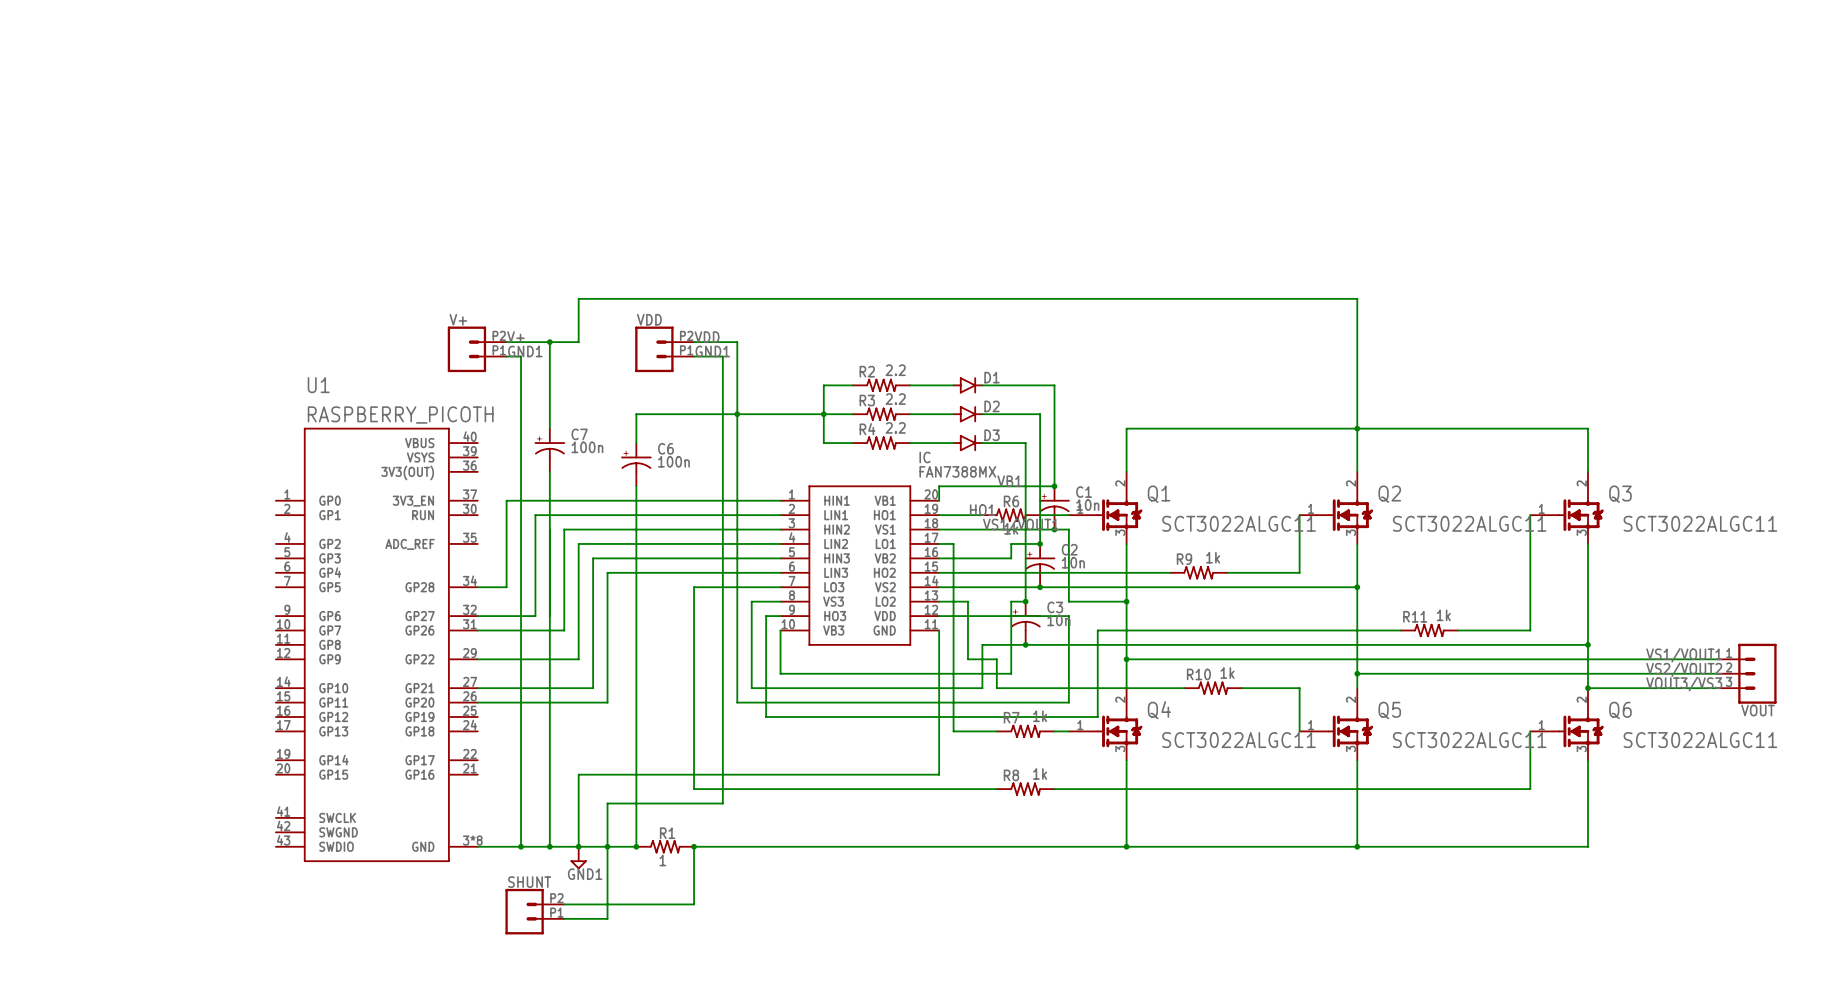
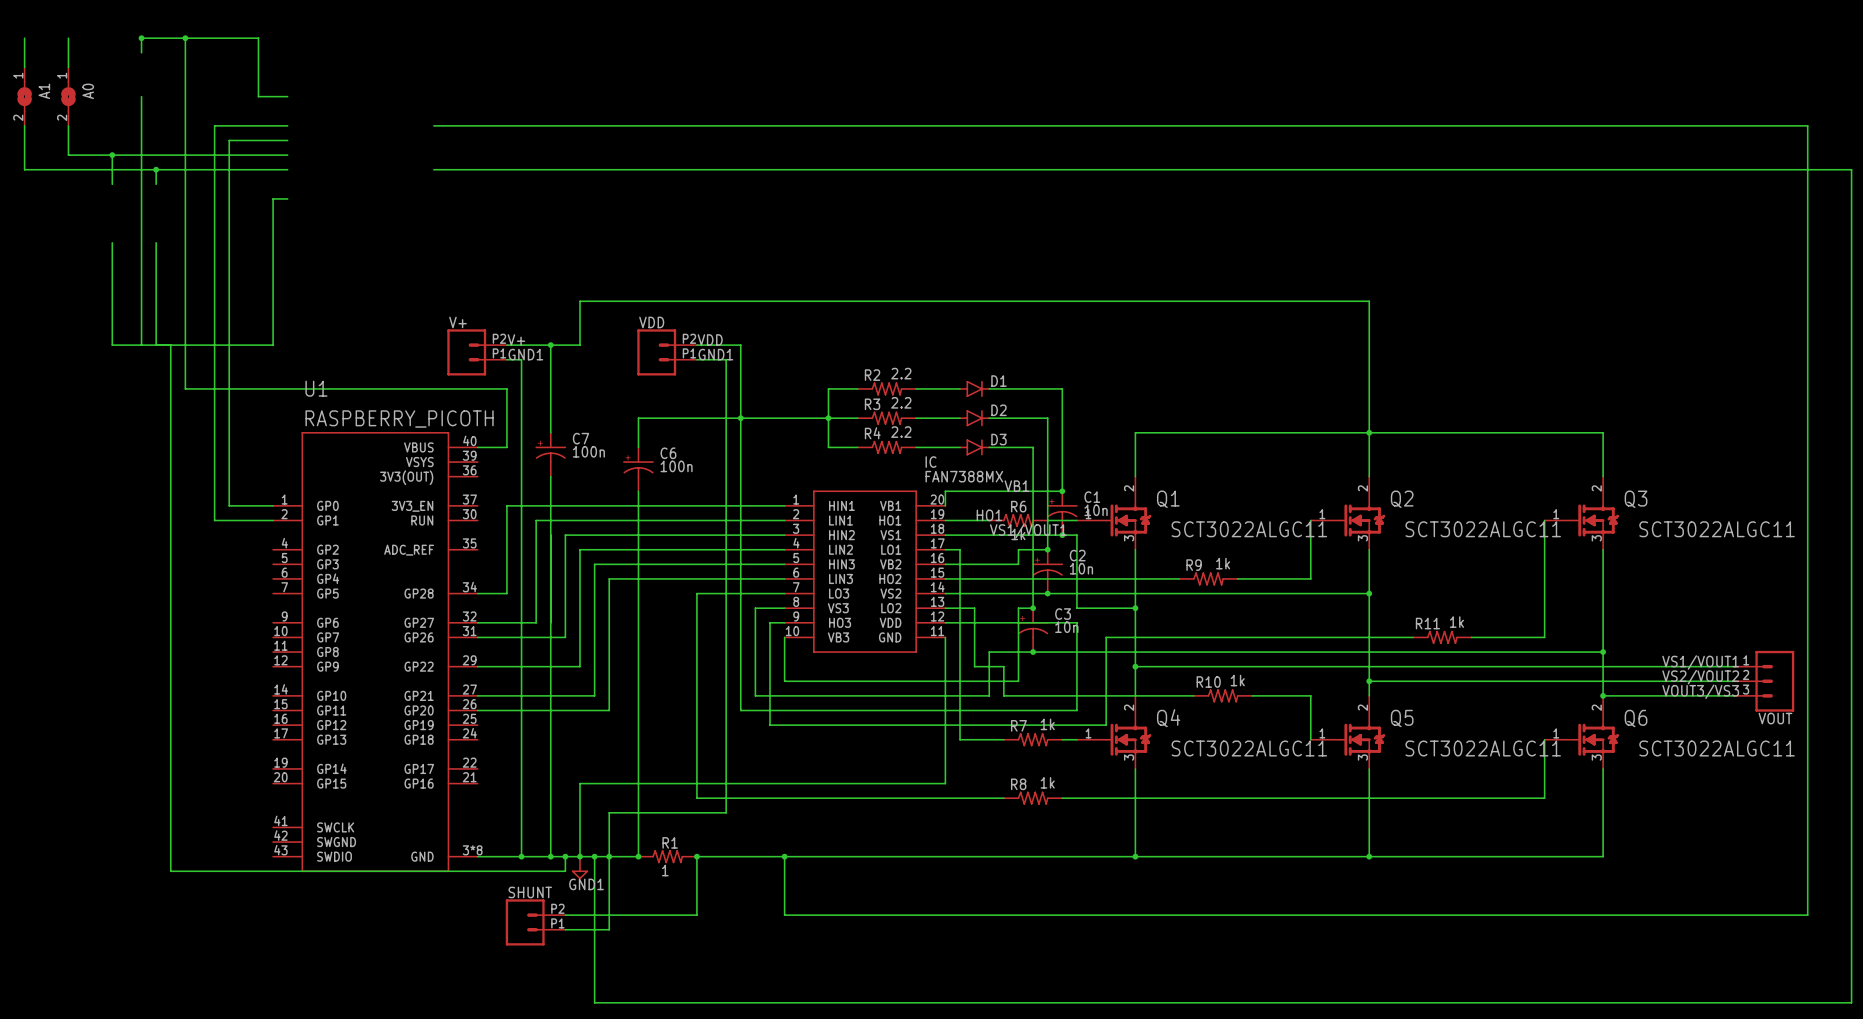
wire: none -> (24, 38) (24, 67)
wire: none -> (68, 38) (68, 67)
junction: none -> (141, 38)
wire: none -> (185, 38) (185, 388) (506, 388) (506, 447) (477, 447)
junction: none -> (185, 38)
wire: none -> (141, 52) (141, 38) (258, 38) (258, 96) (287, 96)
A1: none -> (24, 96)
A0: none -> (68, 96)
wire: none -> (141, 96) (141, 345)
wire: none -> (24, 125) (24, 169) (287, 169)
wire: none -> (68, 125) (68, 155) (287, 155)
wire: none -> (287, 125) (214, 125) (214, 520) (273, 520)
wire: none -> (433, 125) (1807, 125) (1807, 915) (784, 915) (784, 856)
wire: none -> (287, 140) (229, 140) (229, 505) (273, 505)
wire: none -> (112, 155) (112, 184)
junction: none -> (112, 155)
wire: none -> (156, 169) (156, 184)
junction: none -> (156, 169)
wire: none -> (433, 169) (1851, 169) (1851, 1002) (594, 1002) (594, 856)
wire: none -> (287, 198) (273, 198) (273, 345) (112, 345) (112, 242)
wire: none -> (156, 242) (156, 345)
wire: none -> (170, 345) (170, 871) (565, 871) (565, 856)
junction: none -> (565, 856)
junction: none -> (594, 856)
junction: none -> (784, 856)

